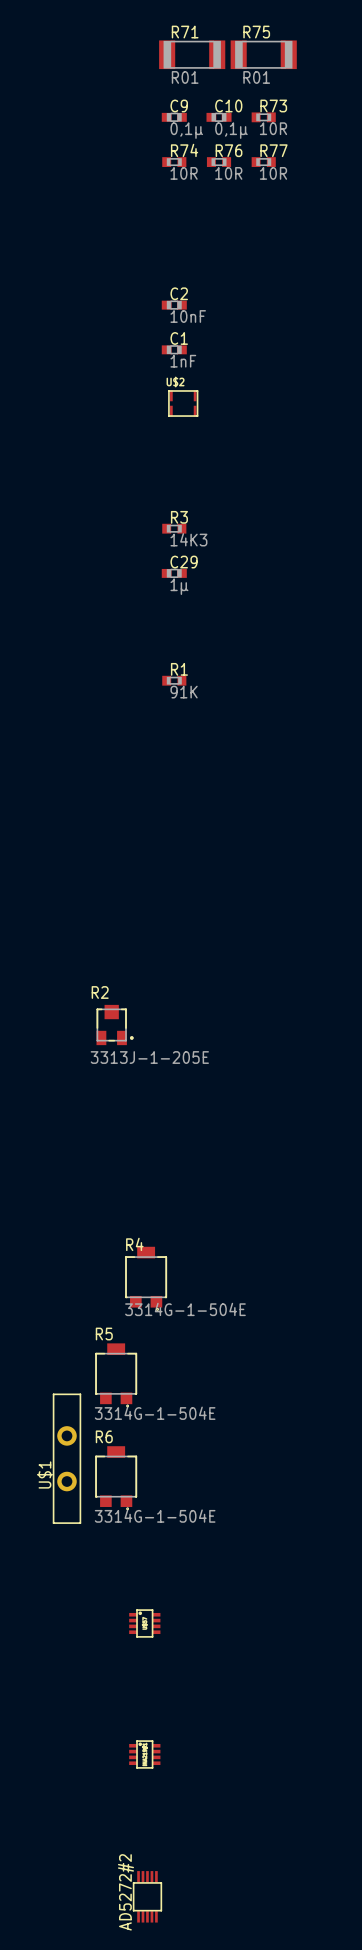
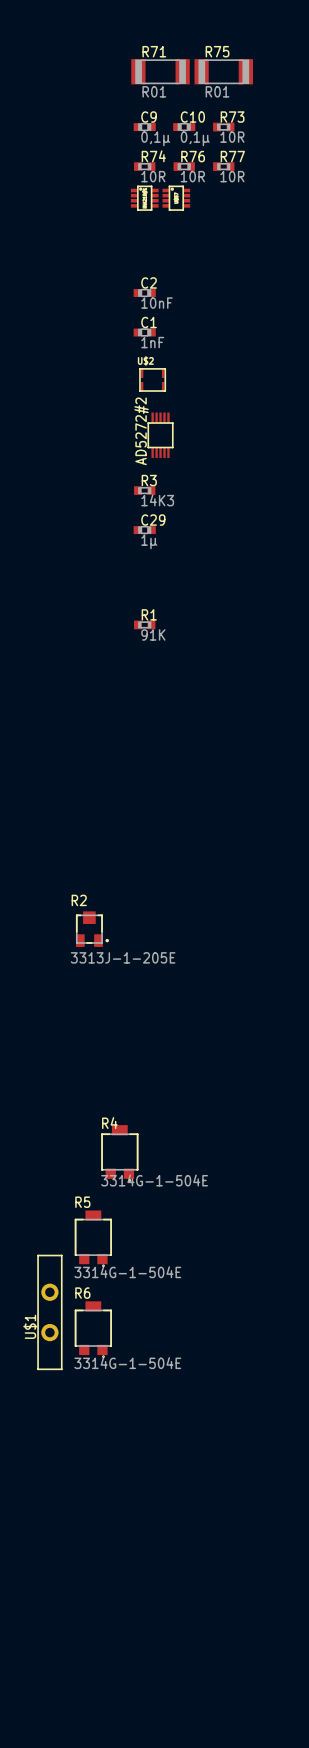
part footprint: [129, 1609, 161, 1638] -> [162, 185, 191, 211]
part footprint: [129, 1740, 161, 1769] -> [130, 185, 159, 211]
AD5272#2 position: (147, 1896) -> (160, 435)

